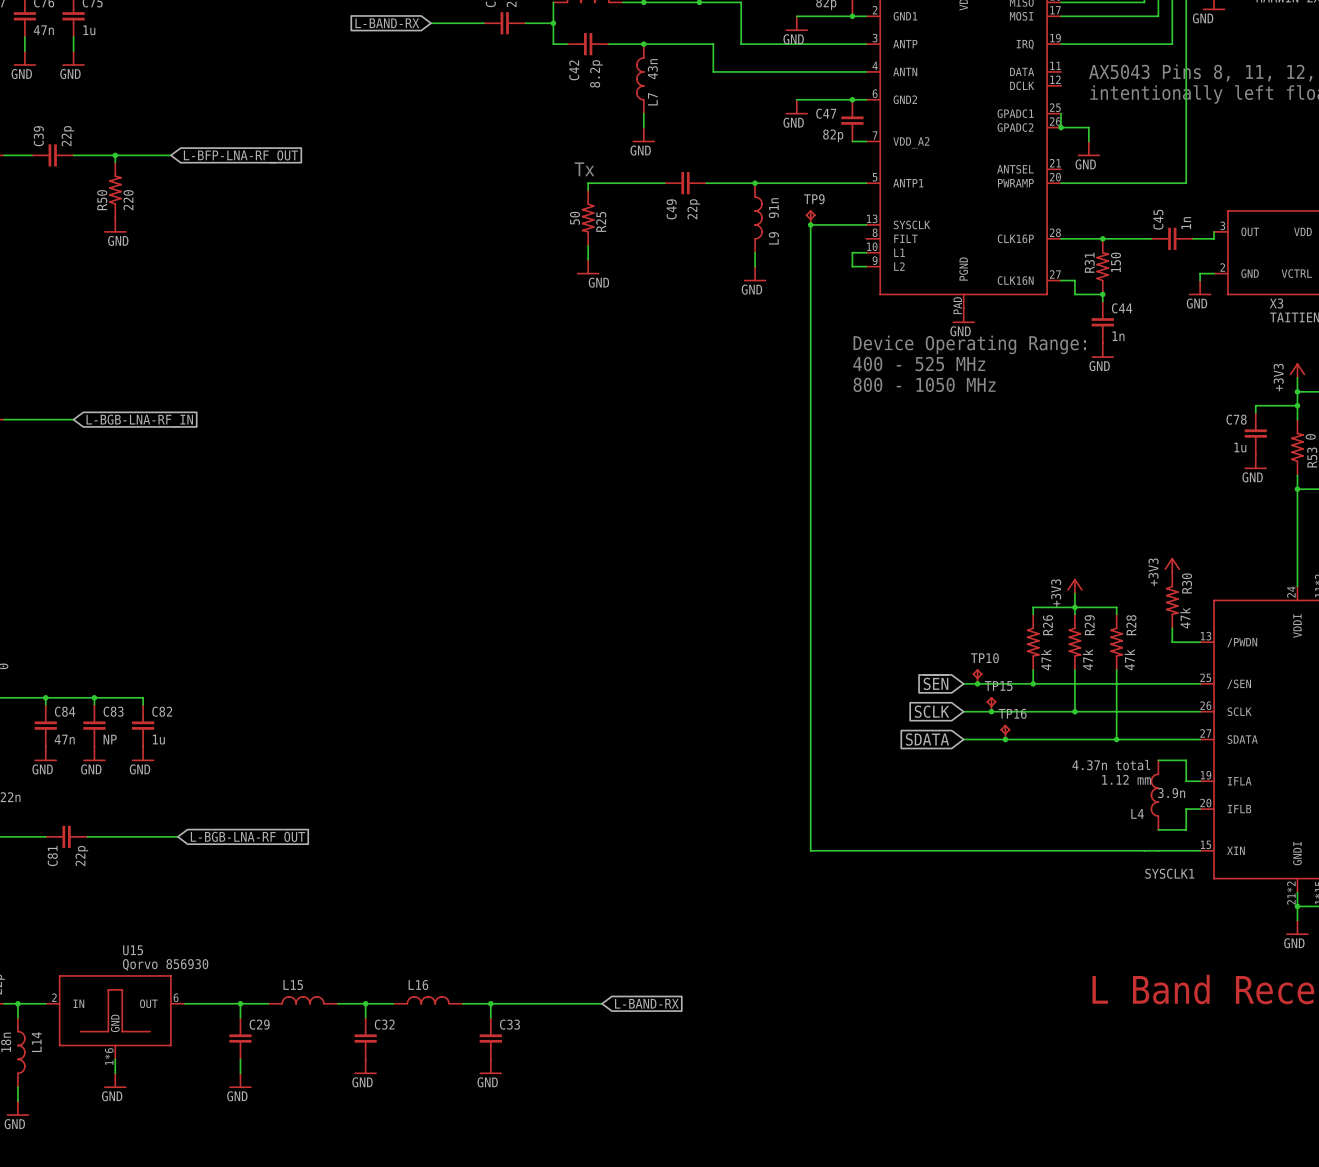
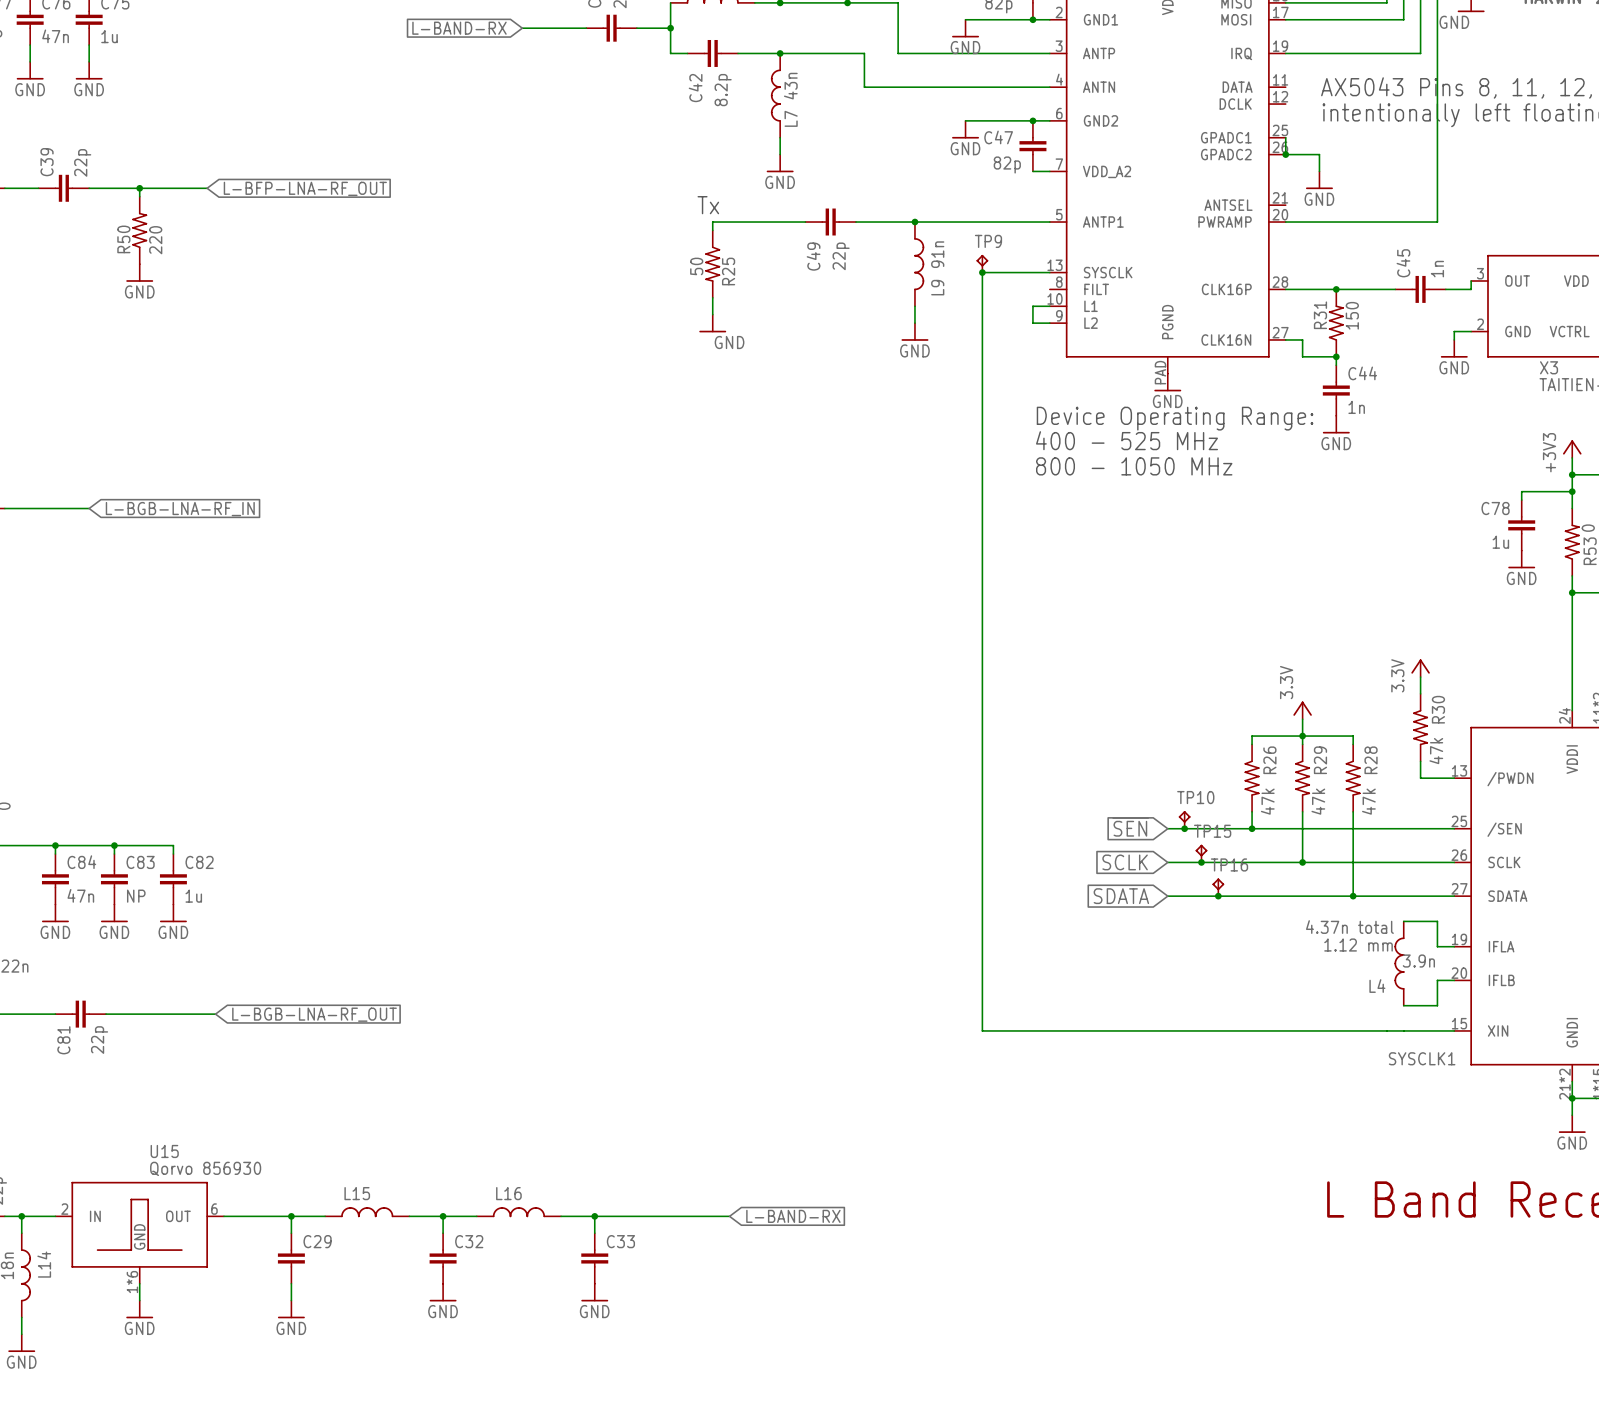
power symbol: none -> (1420, 668)
label: none -> 3.3V (1397, 675)
label: none -> 3.3V (1286, 682)
power symbol: +3V3 (1172, 565) -> none
power symbol text: +3V3 (1056, 593) -> none

